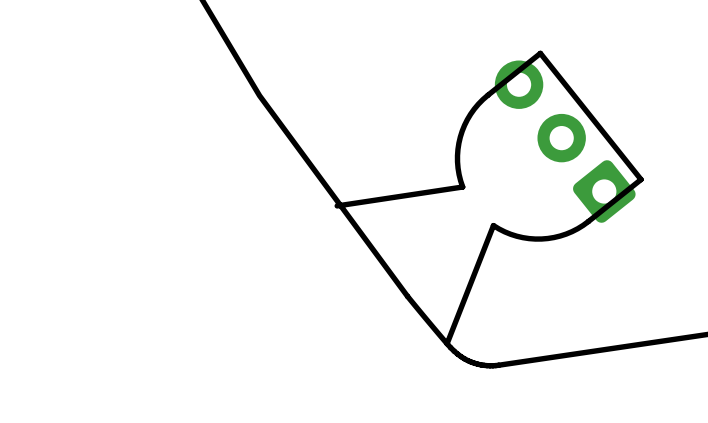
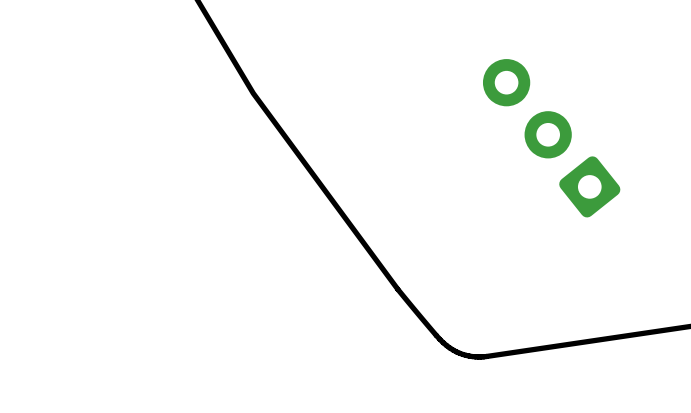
board edge: (337, 205) (462, 187) (459, 174) (457, 155) (460, 137) (467, 119) (482, 99) (540, 53) (641, 179) (583, 225) (560, 236) (541, 239) (522, 237) (504, 231) (493, 225) (447, 343) -> none

